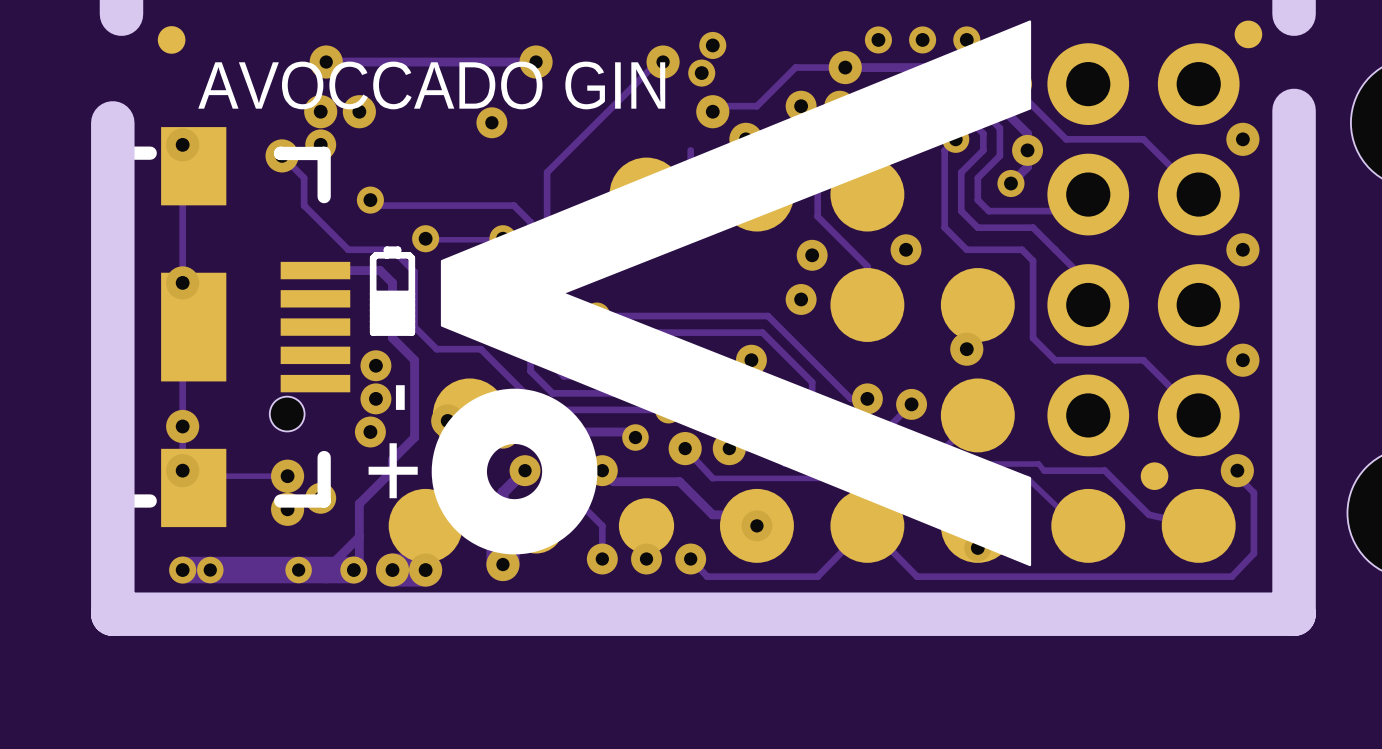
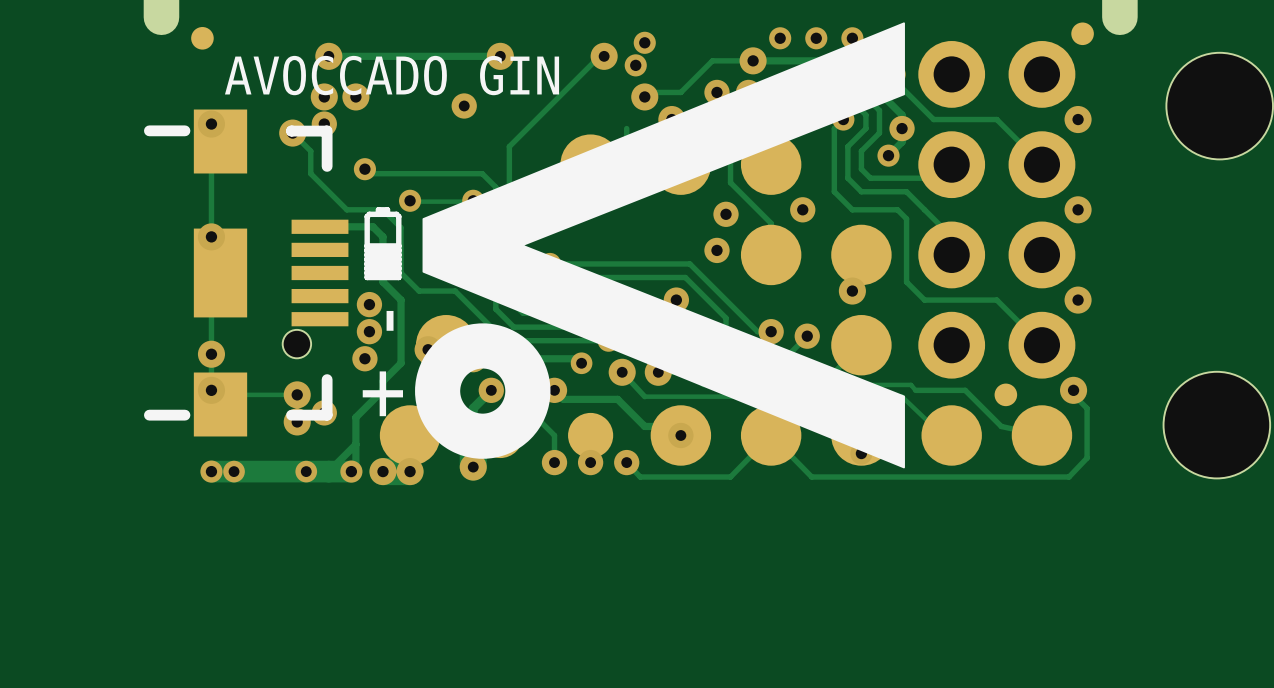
board edge: (1294, 110) (1294, 614) (112, 614) (112, 122) -> none

